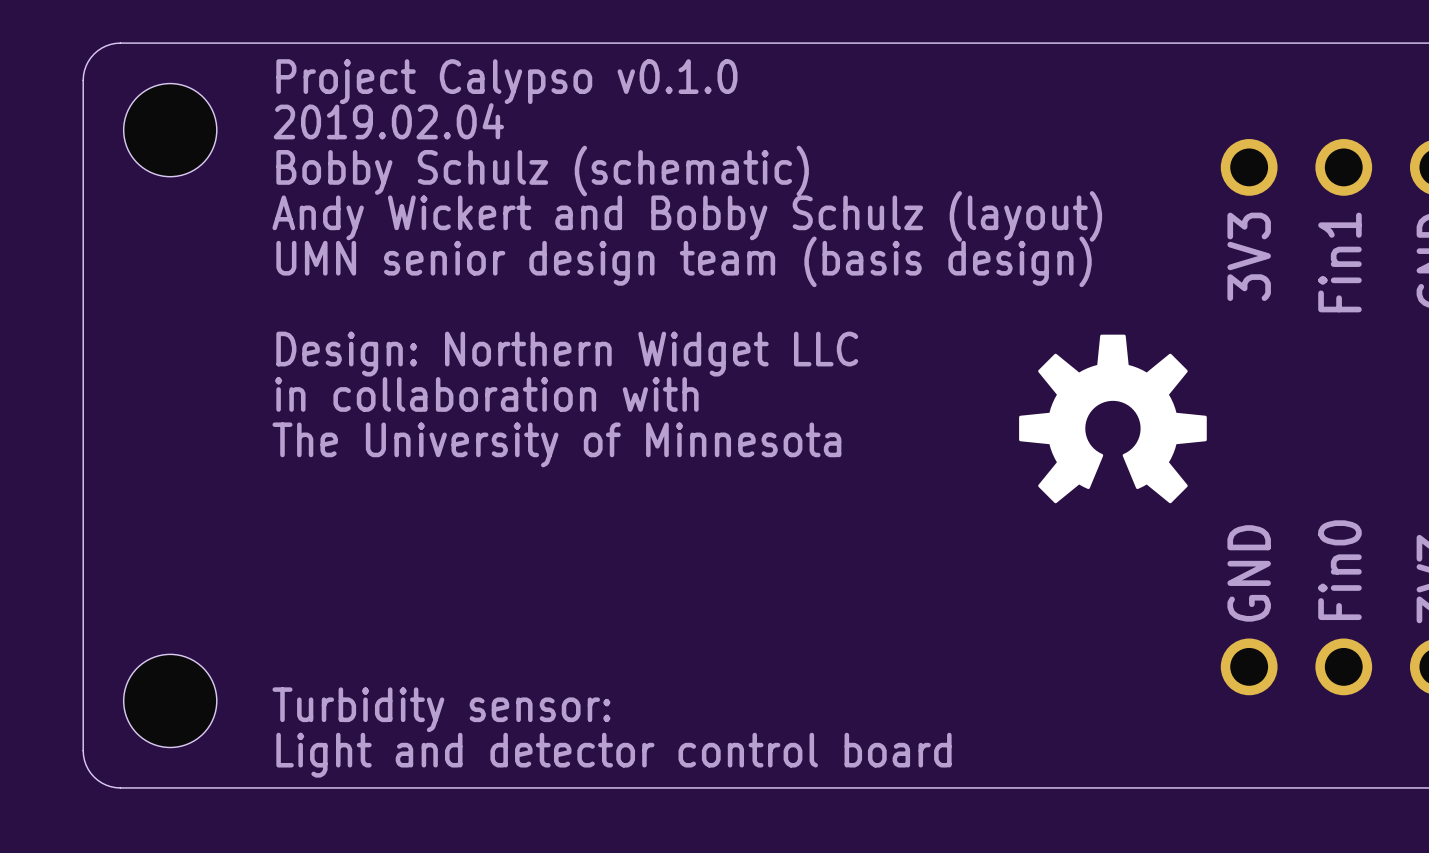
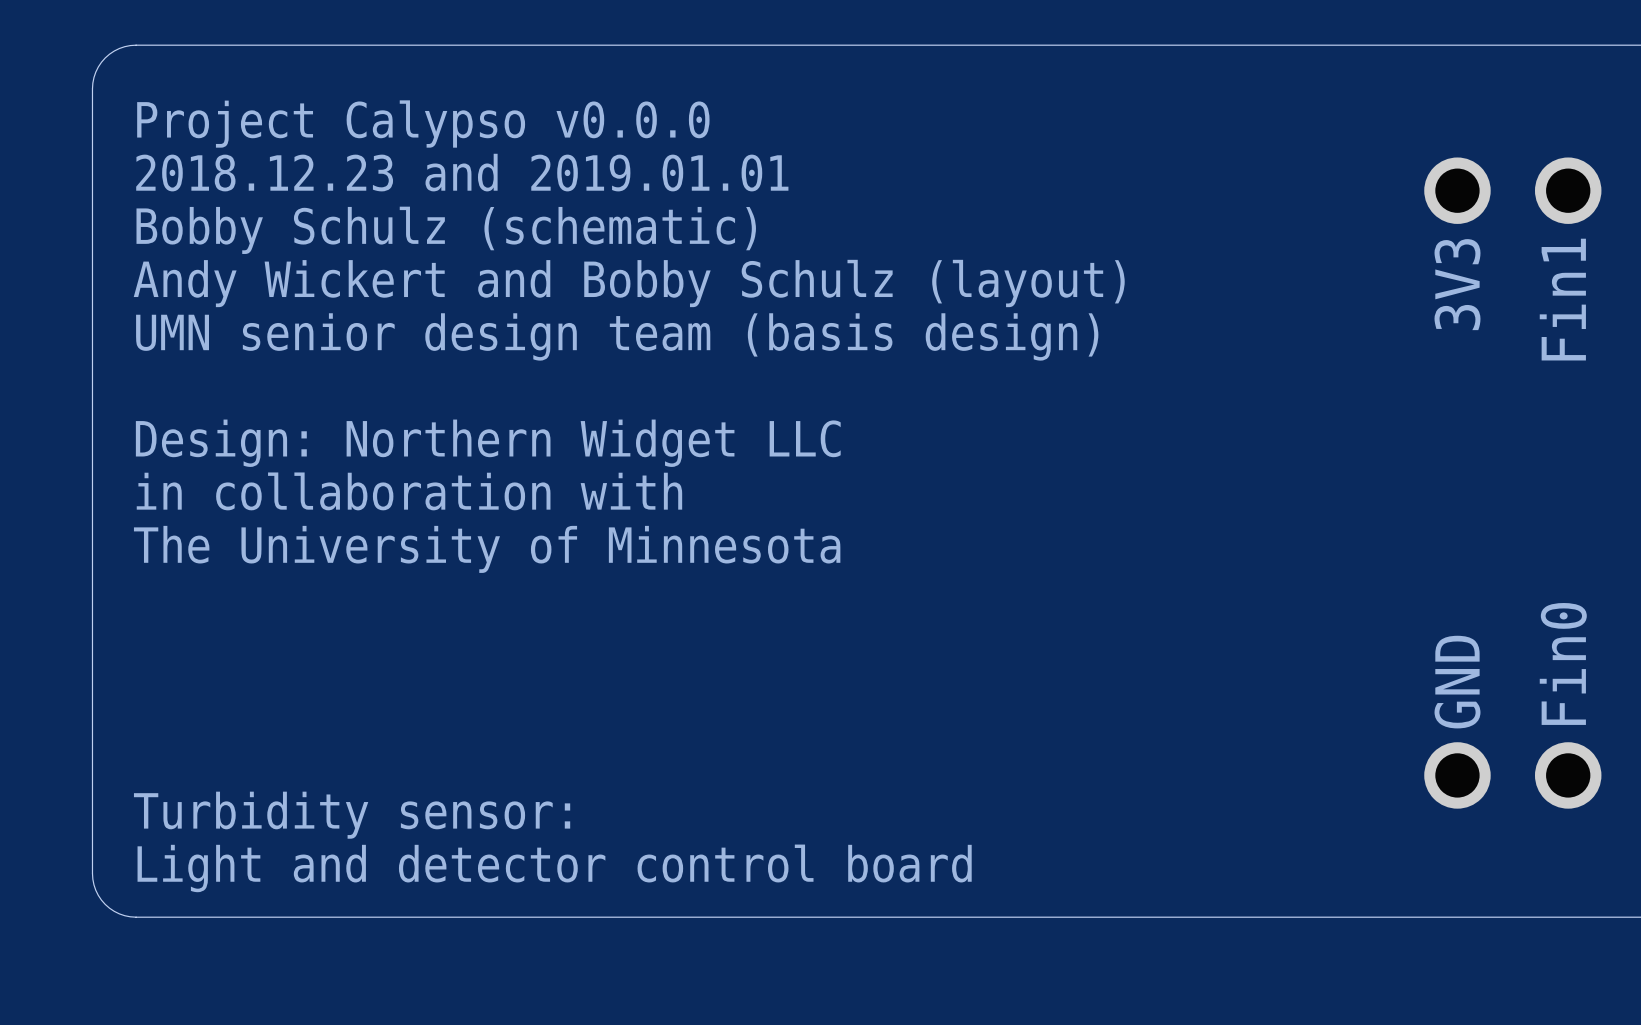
text: Project Calypso v0.1.0 (506, 81) -> Project Calypso v0.0.0 (423, 124)
text: 2019.02.04 (388, 121) -> none
part: (170, 130) -> none
text: none -> 2018.12.23 and 2019.01.01 (462, 172)
text position: Bobby Schulz (schematic) (542, 171) -> Bobby Schulz (schematic) (446, 230)
text position: Andy Wickert and Bobby Schulz (layout) (687, 216) -> Andy Wickert and Bobby Schulz (layout) (629, 283)
text position: UMN senior design team (basis design) (684, 261) -> UMN senior design team (basis design) (617, 336)
drawing: [1019, 334, 1207, 504] -> none
text position: Design: Northern Widget LLC (567, 354) -> Design: Northern Widget LLC (488, 443)
text position: in collaboration with (486, 394) -> in collaboration with (409, 491)
text position: The University of Minnesota (556, 444) -> The University of Minnesota (487, 549)
part: (170, 700) -> none
text position: Turbidity sensor: (441, 709) -> Turbidity sensor: (352, 815)
text position: Light and detector control board (613, 755) -> Light and detector control board (554, 868)

